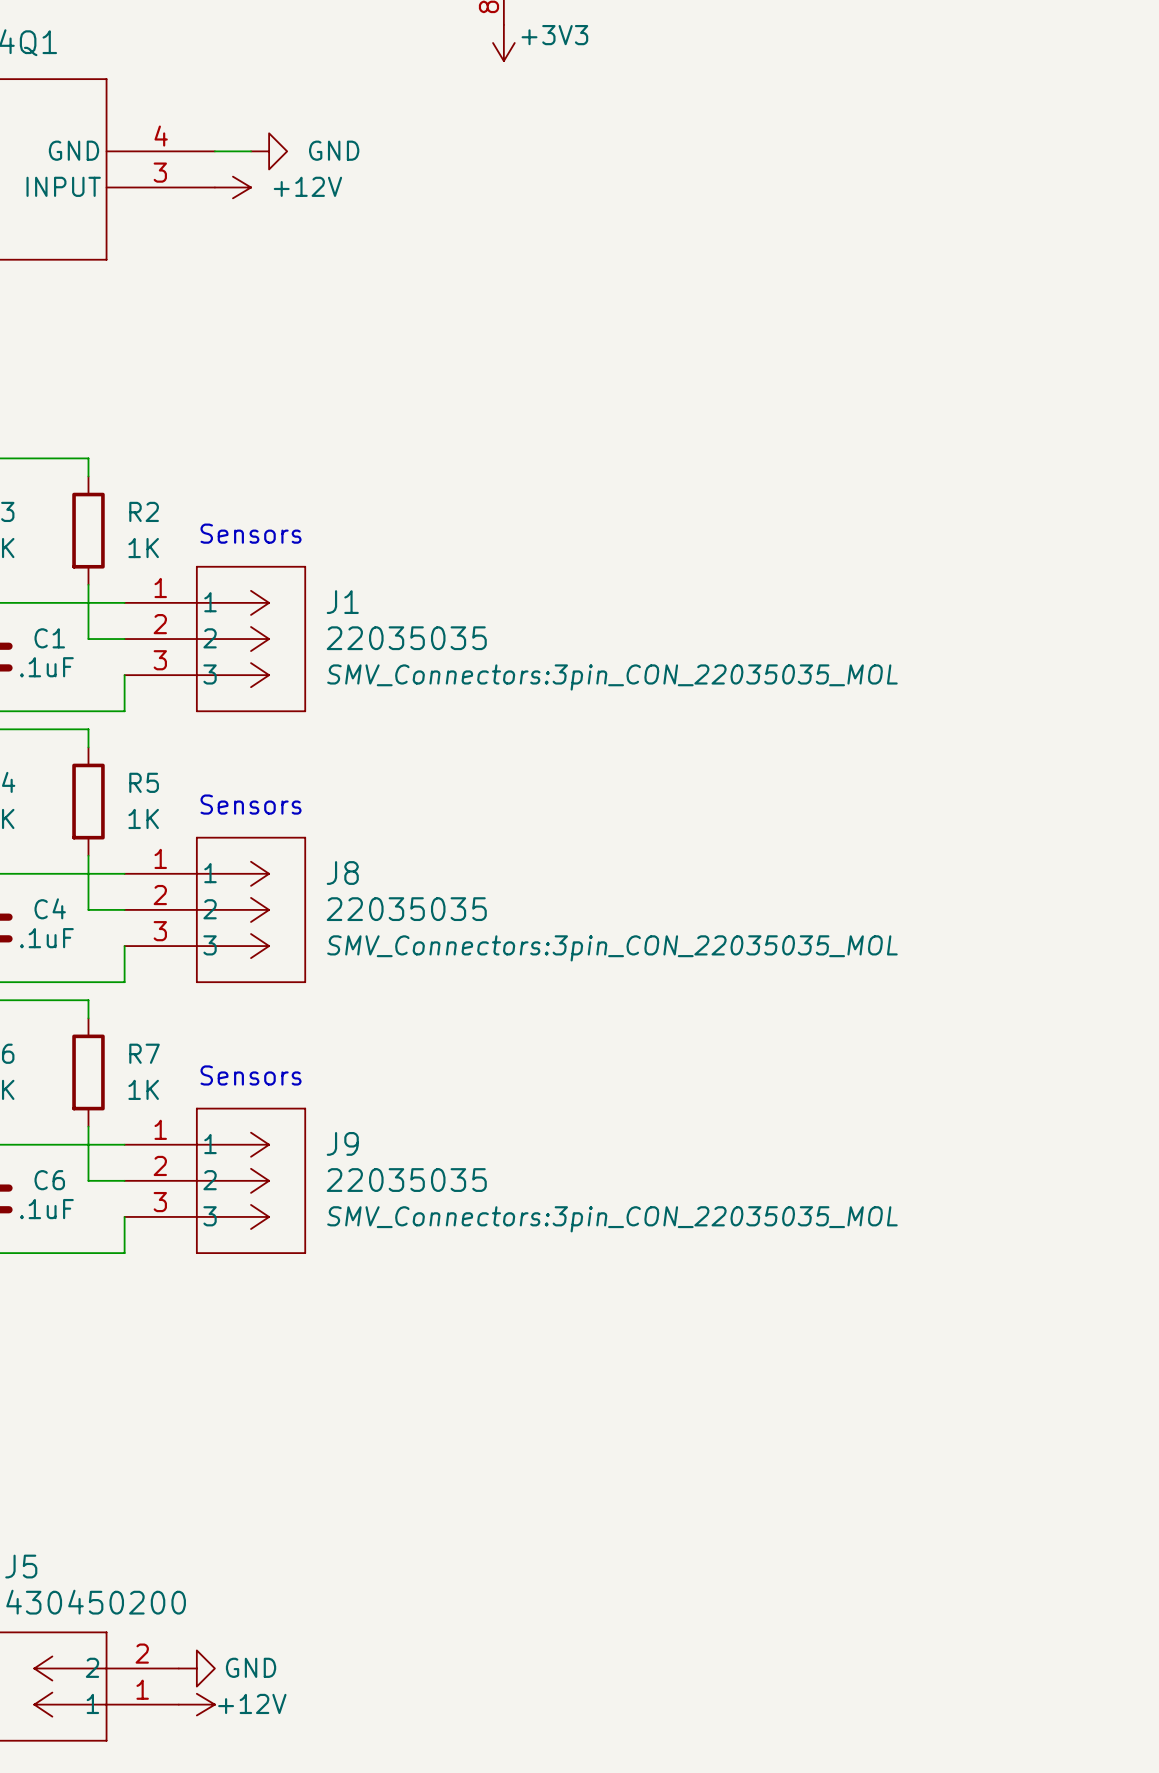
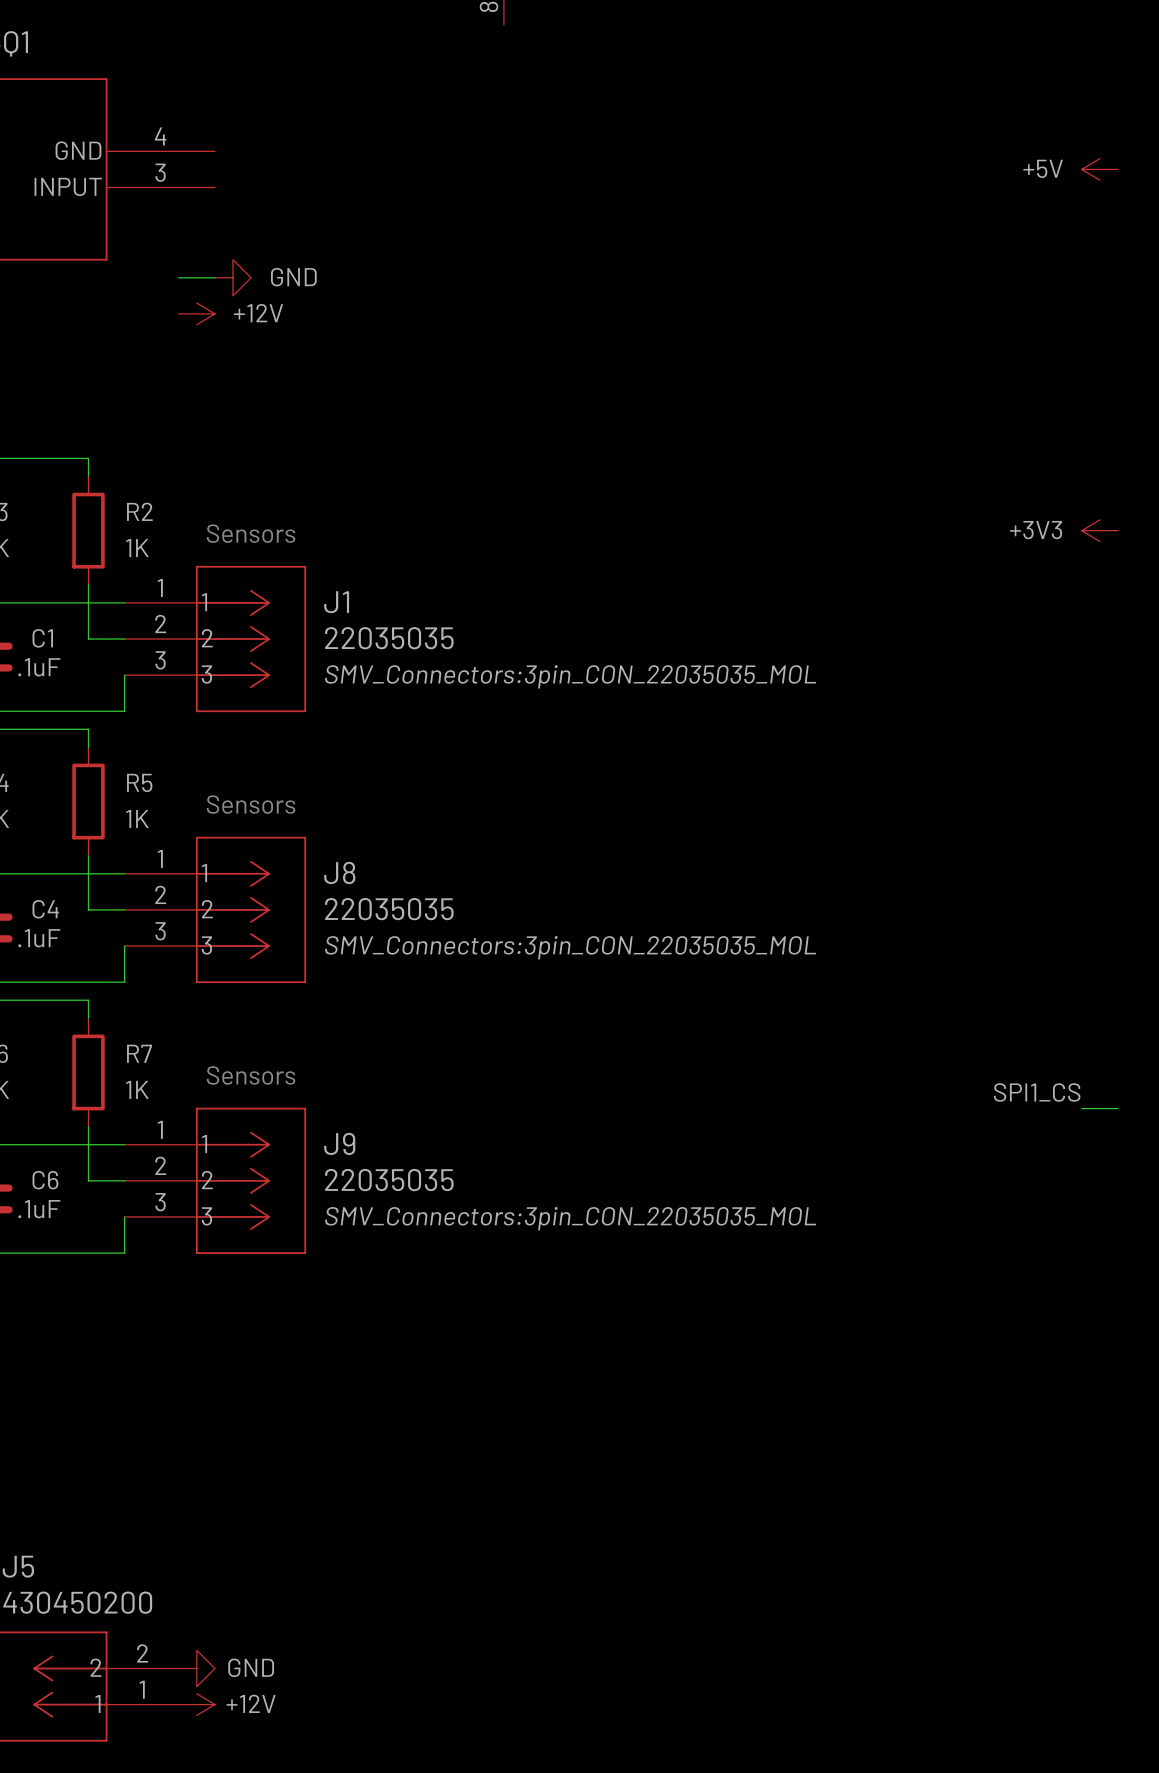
power symbol: +3V3 (503, 43) -> none
wire: (214, 151) (251, 151) -> (178, 277) (214, 277)
power symbol position: GND (269, 151) -> GND (232, 277)
power symbol: none -> +5V (1099, 169)
power symbol position: +12V (232, 187) -> +12V (196, 313)
power symbol: none -> +3V3 (1099, 530)
label: none -> SPI1_CS (1037, 1092)
wire: none -> (1081, 1108) (1117, 1108)

